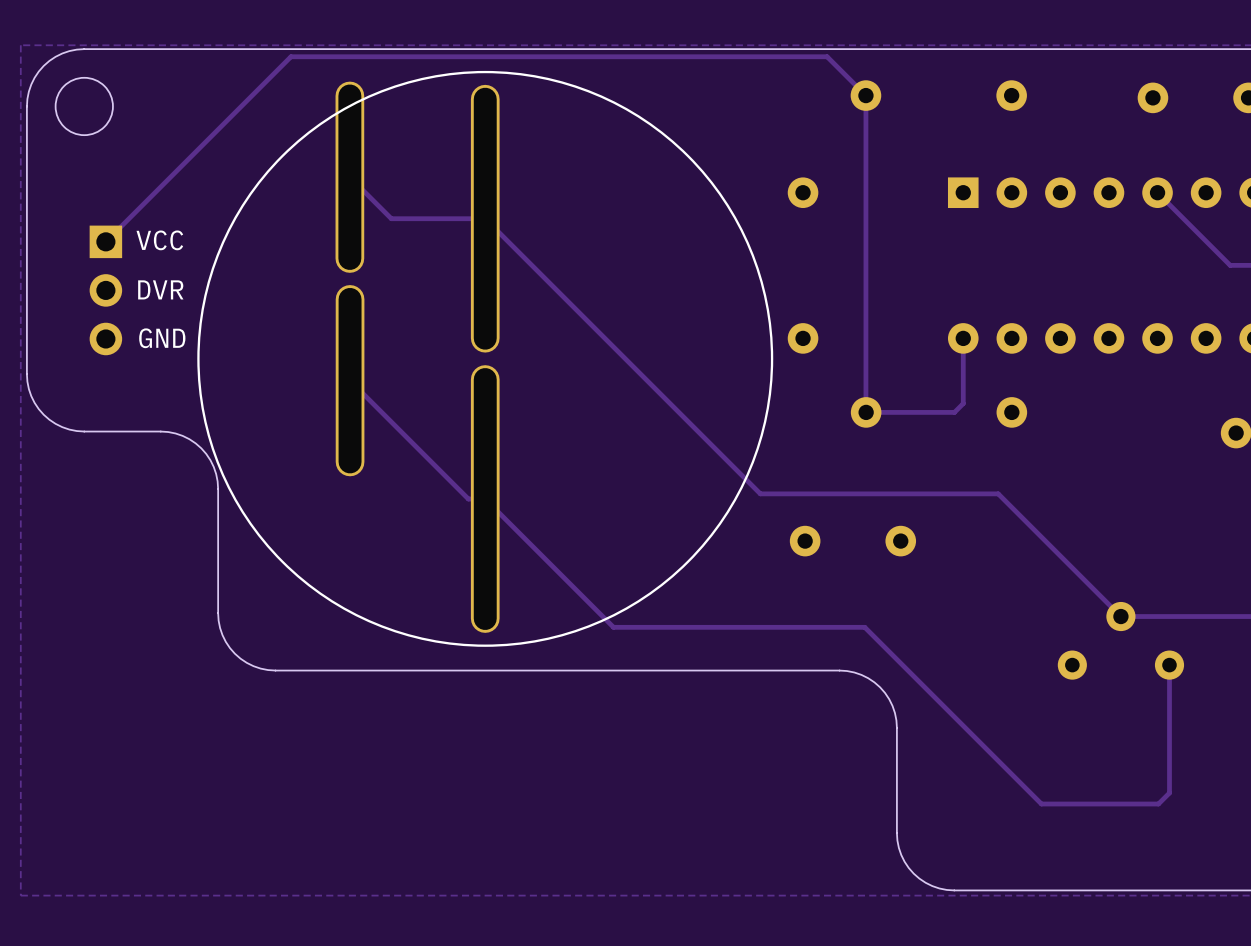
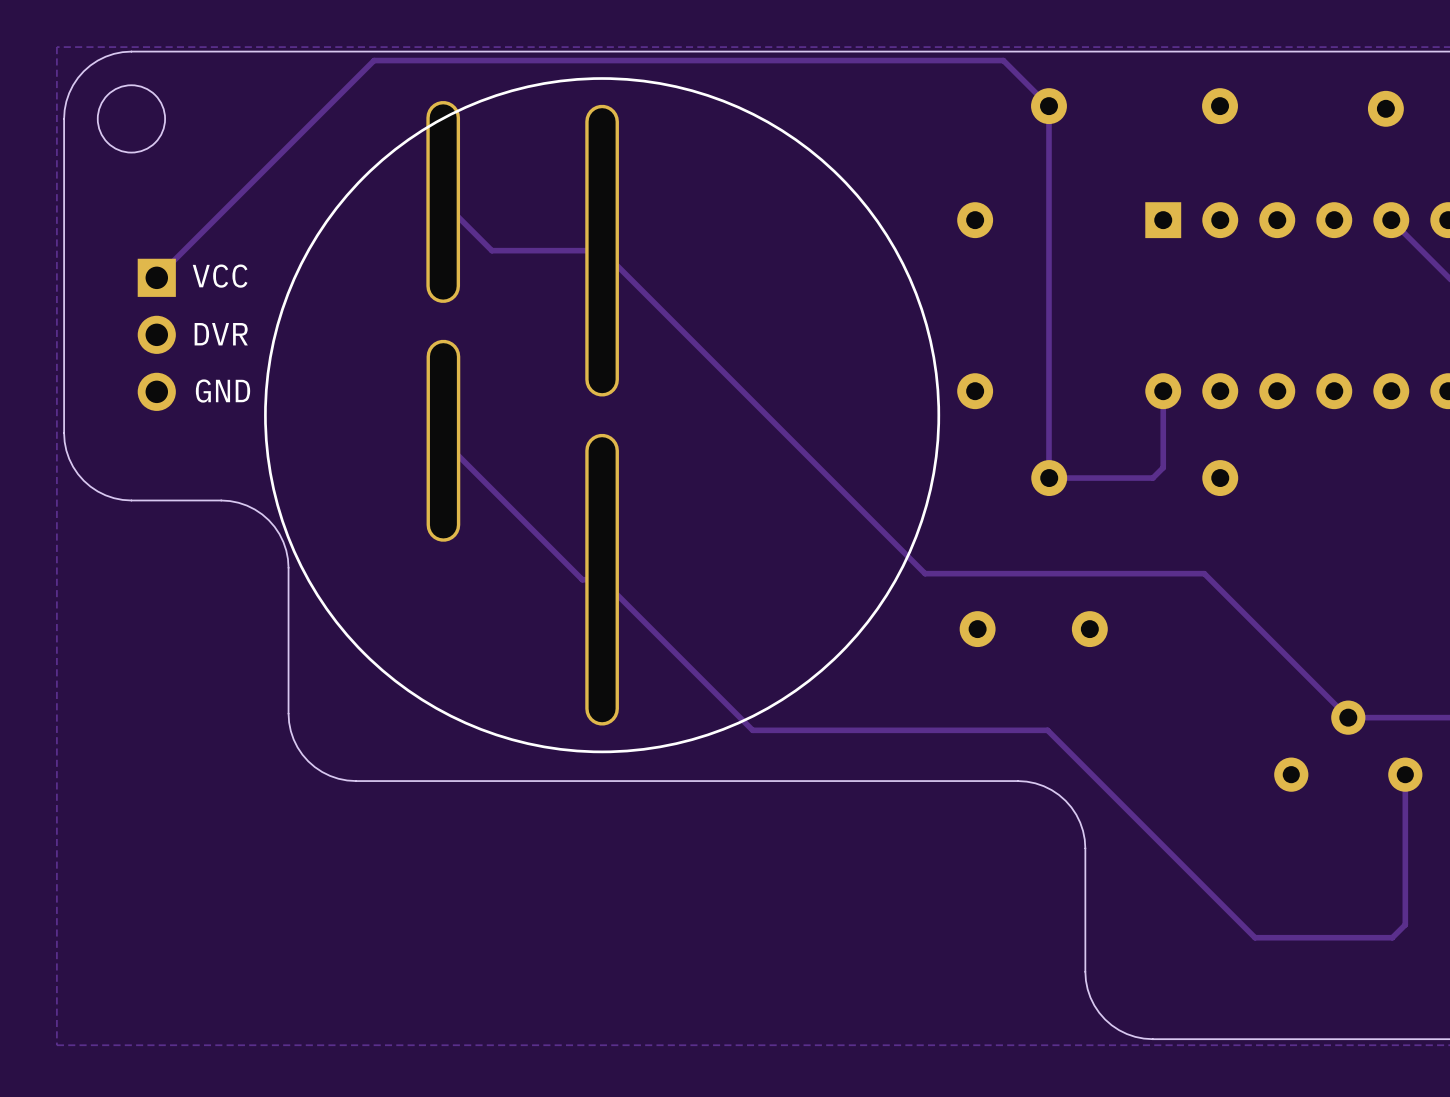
part footprint: [197, 70, 774, 647] -> [264, 77, 941, 754]
part footprint: [335, 81, 365, 477] -> [426, 100, 461, 542]

